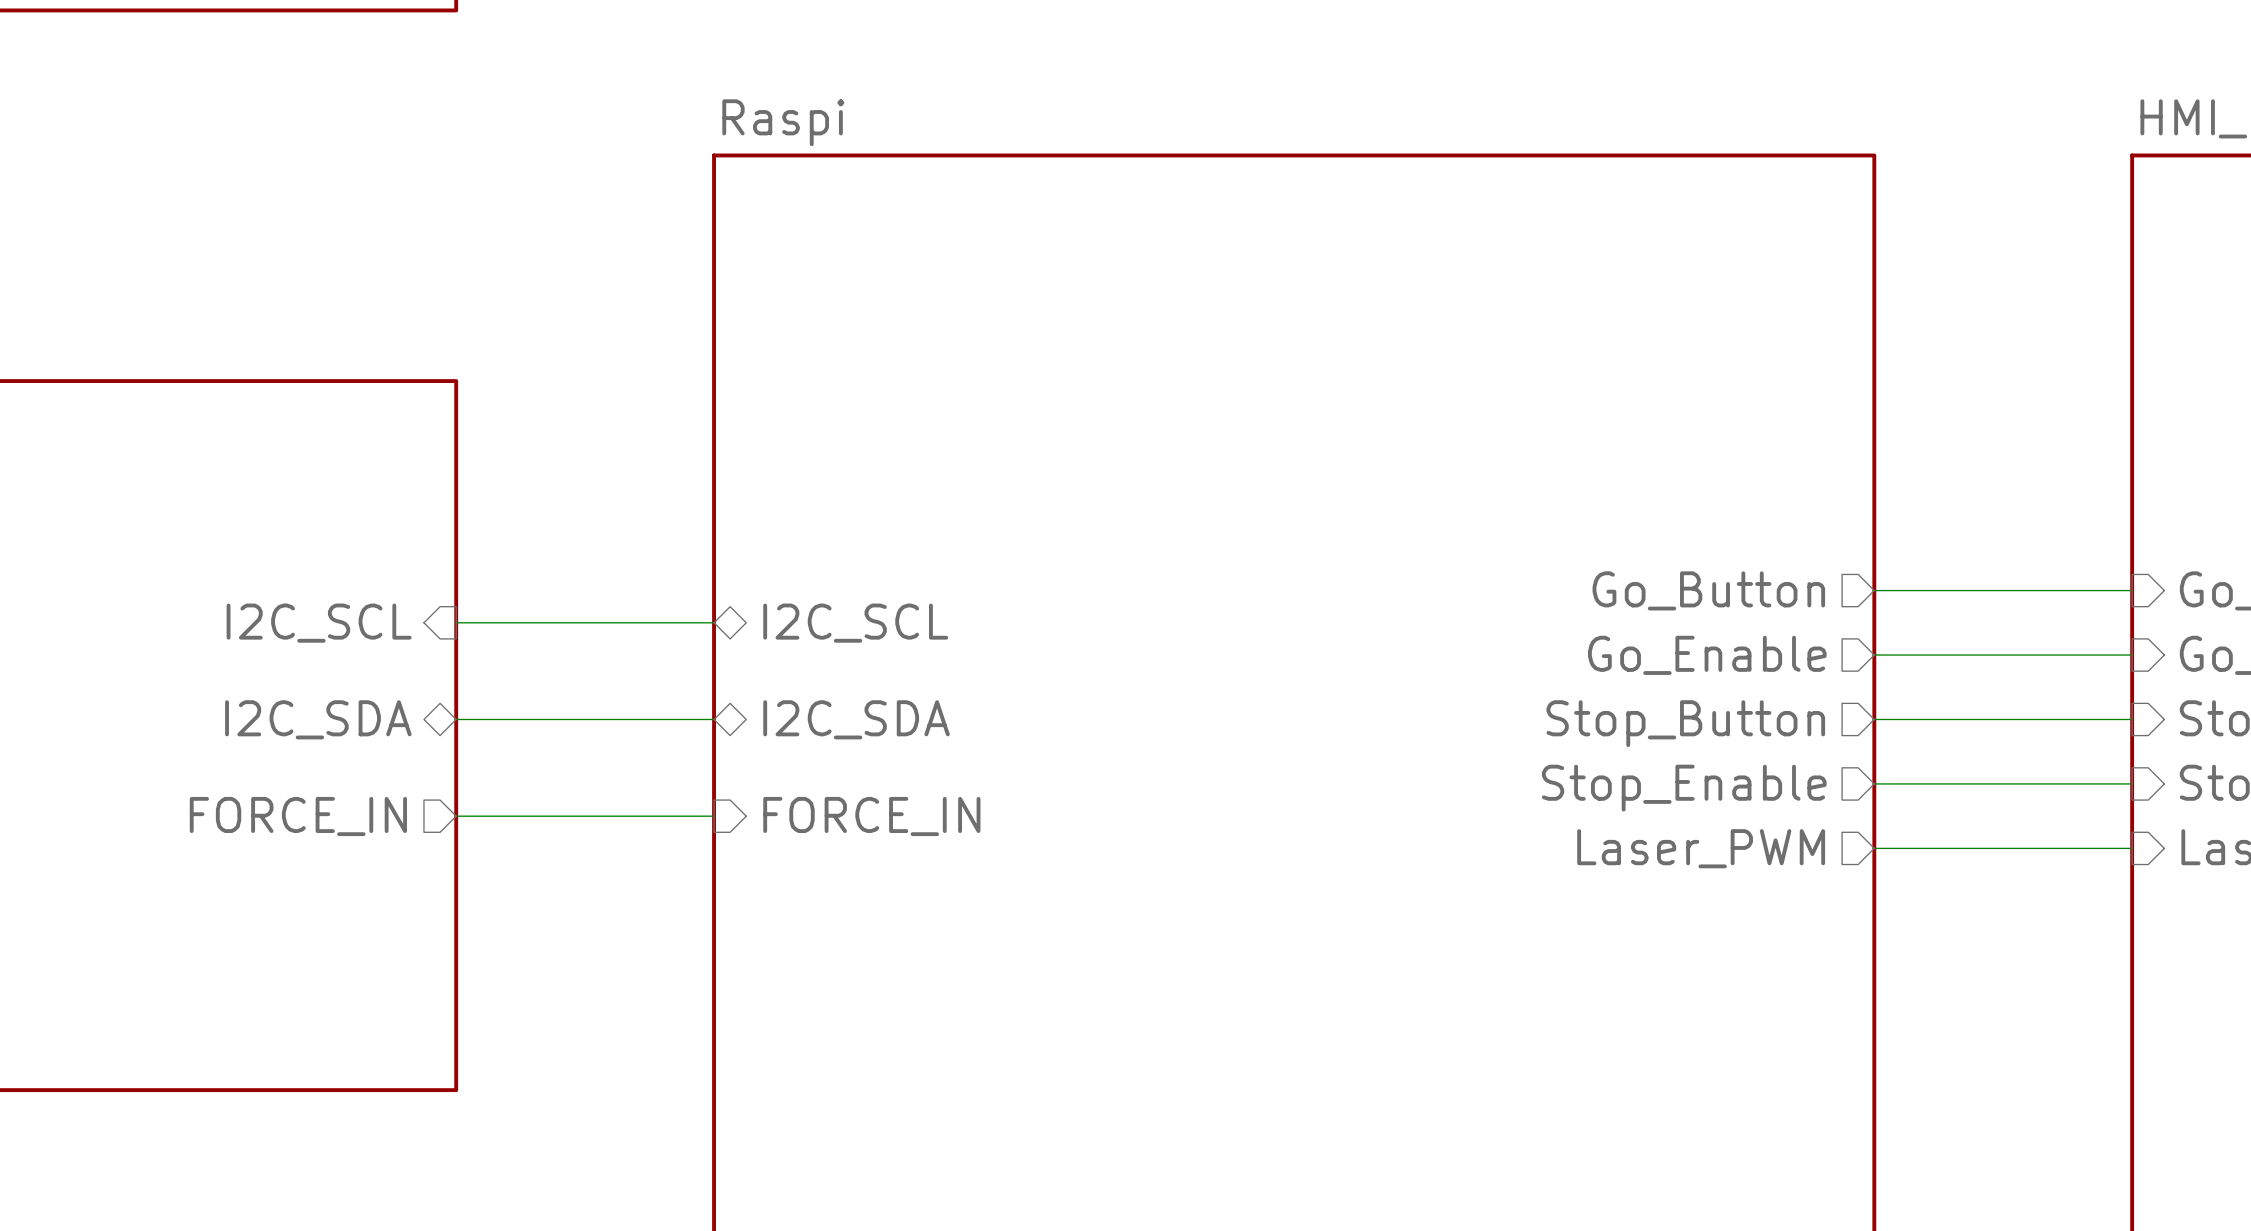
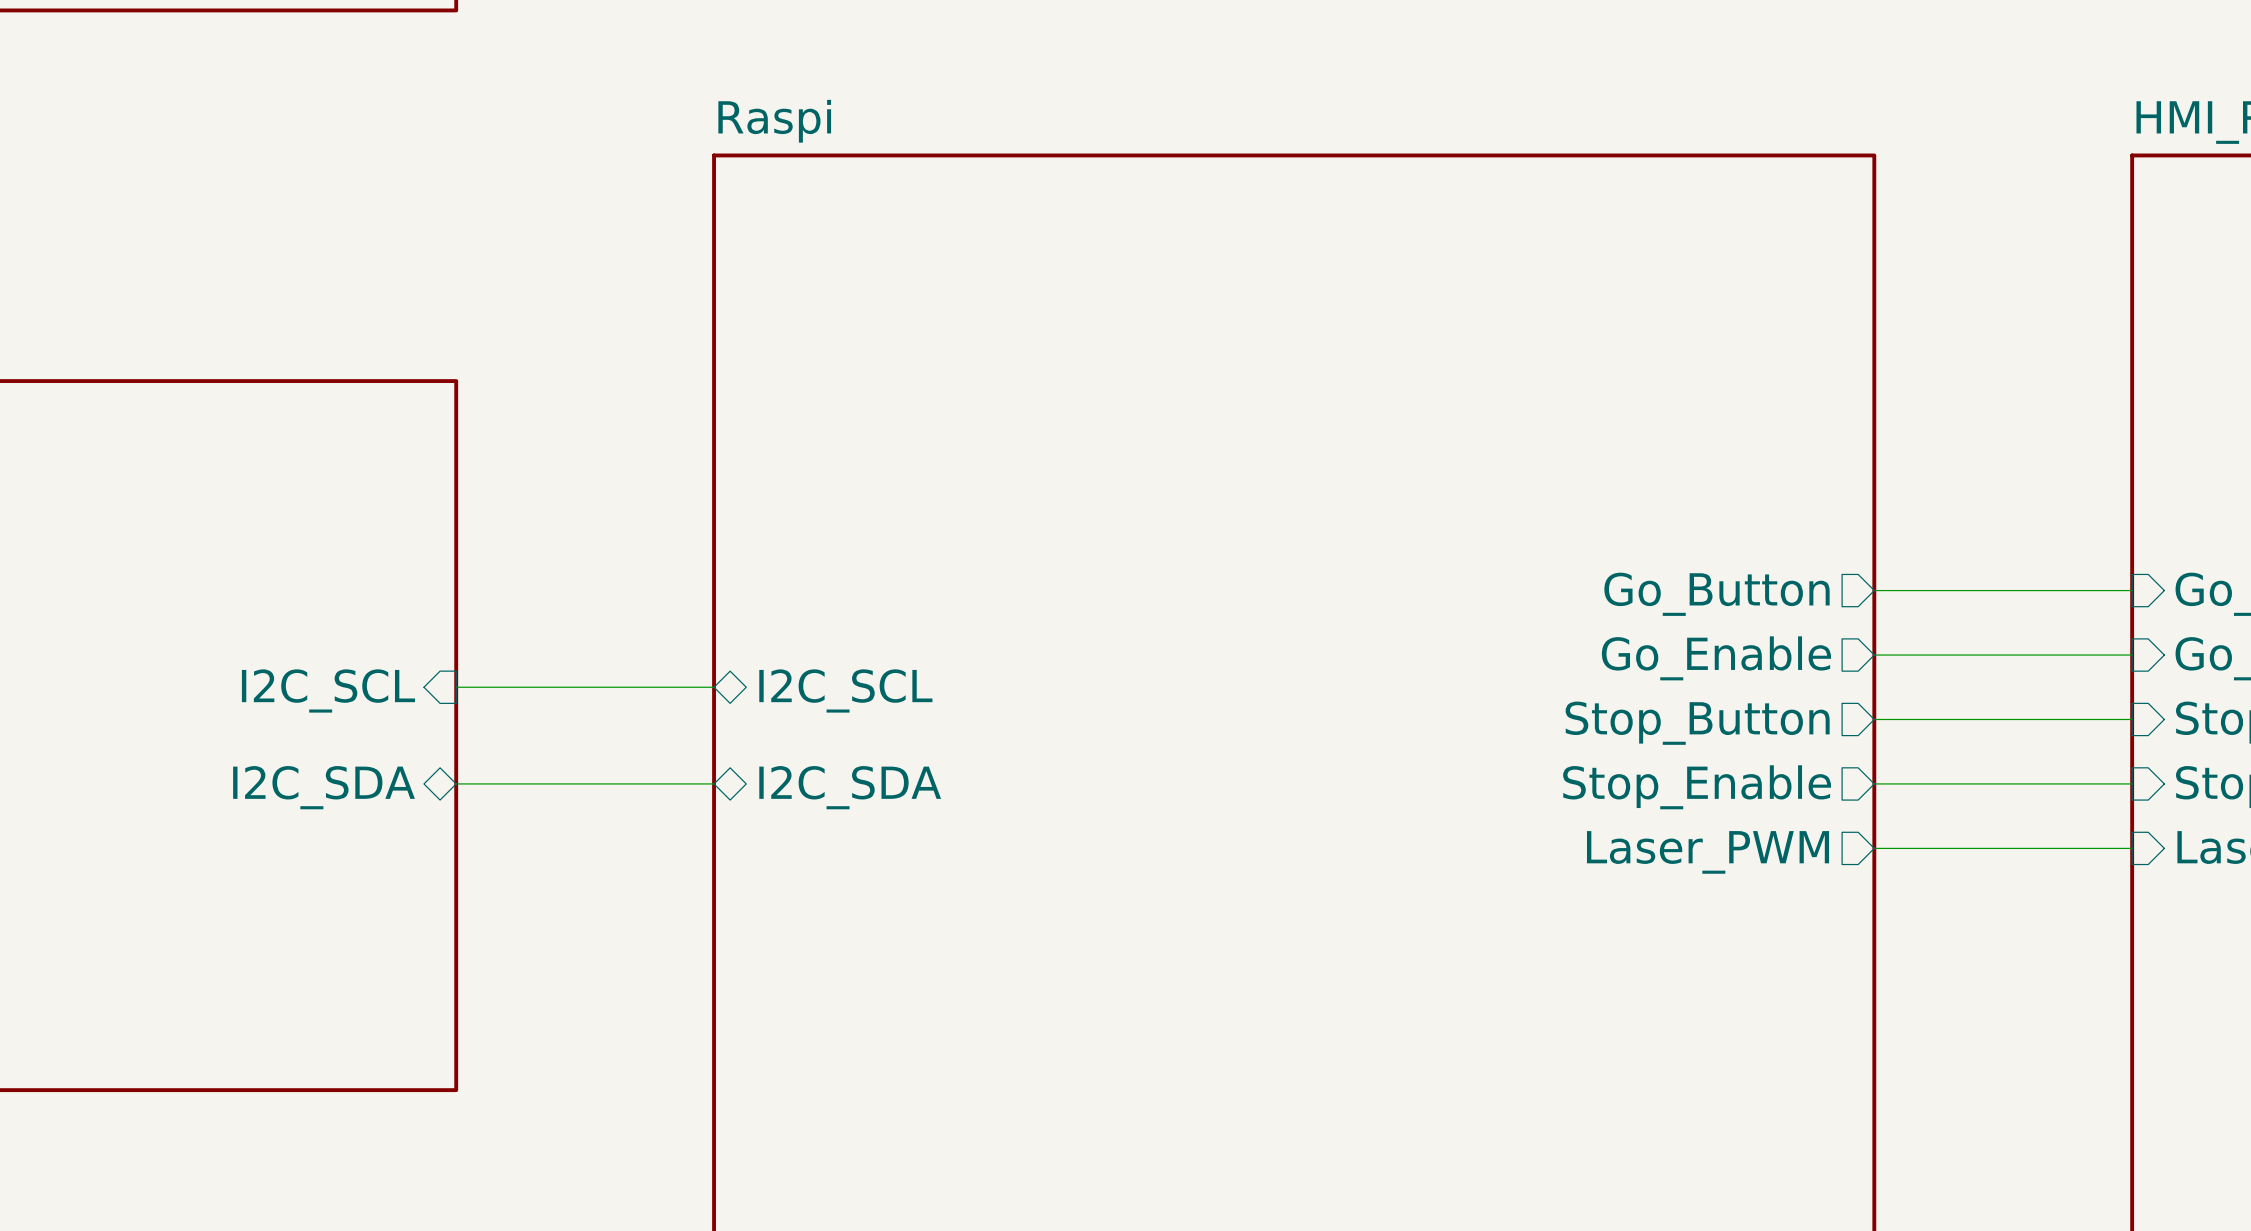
wire: (456, 622) (714, 622) -> none
sheet pin position: I2C_SCL (319, 623) -> I2C_SCL (328, 690)
sheet pin position: I2C_SCL (855, 623) -> I2C_SCL (845, 690)
sheet pin position: I2C_SDA (318, 719) -> I2C_SDA (324, 787)
wire: (456, 719) (714, 719) -> (456, 687) (714, 687)
sheet pin position: I2C_SDA (856, 719) -> I2C_SDA (850, 787)
sheet pin: FORCE_IN (298, 816) -> none
wire: (456, 816) (714, 816) -> (456, 783) (714, 783)
sheet pin: FORCE_IN (871, 816) -> none

